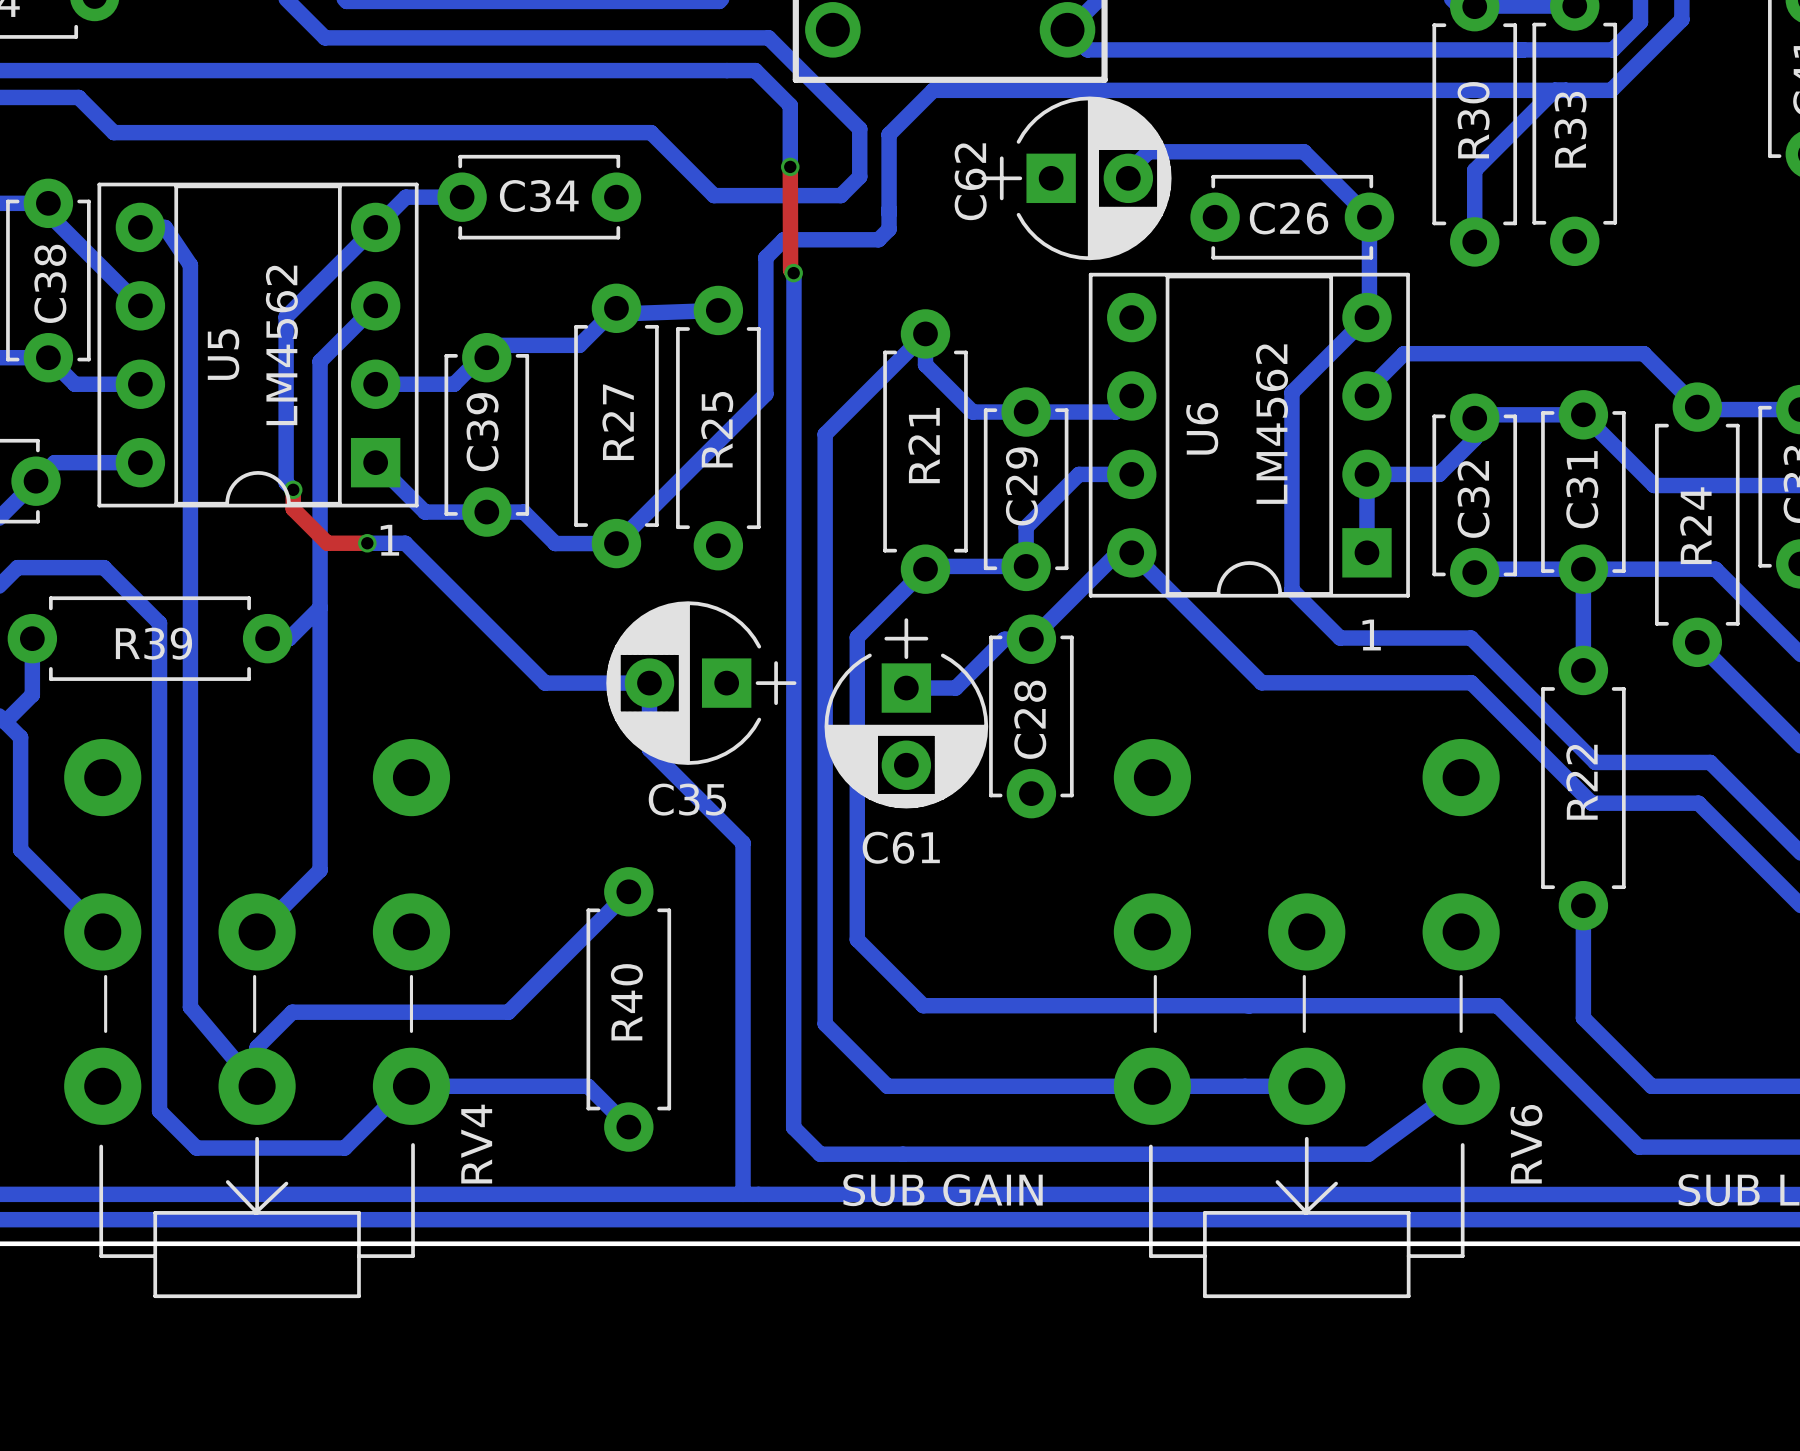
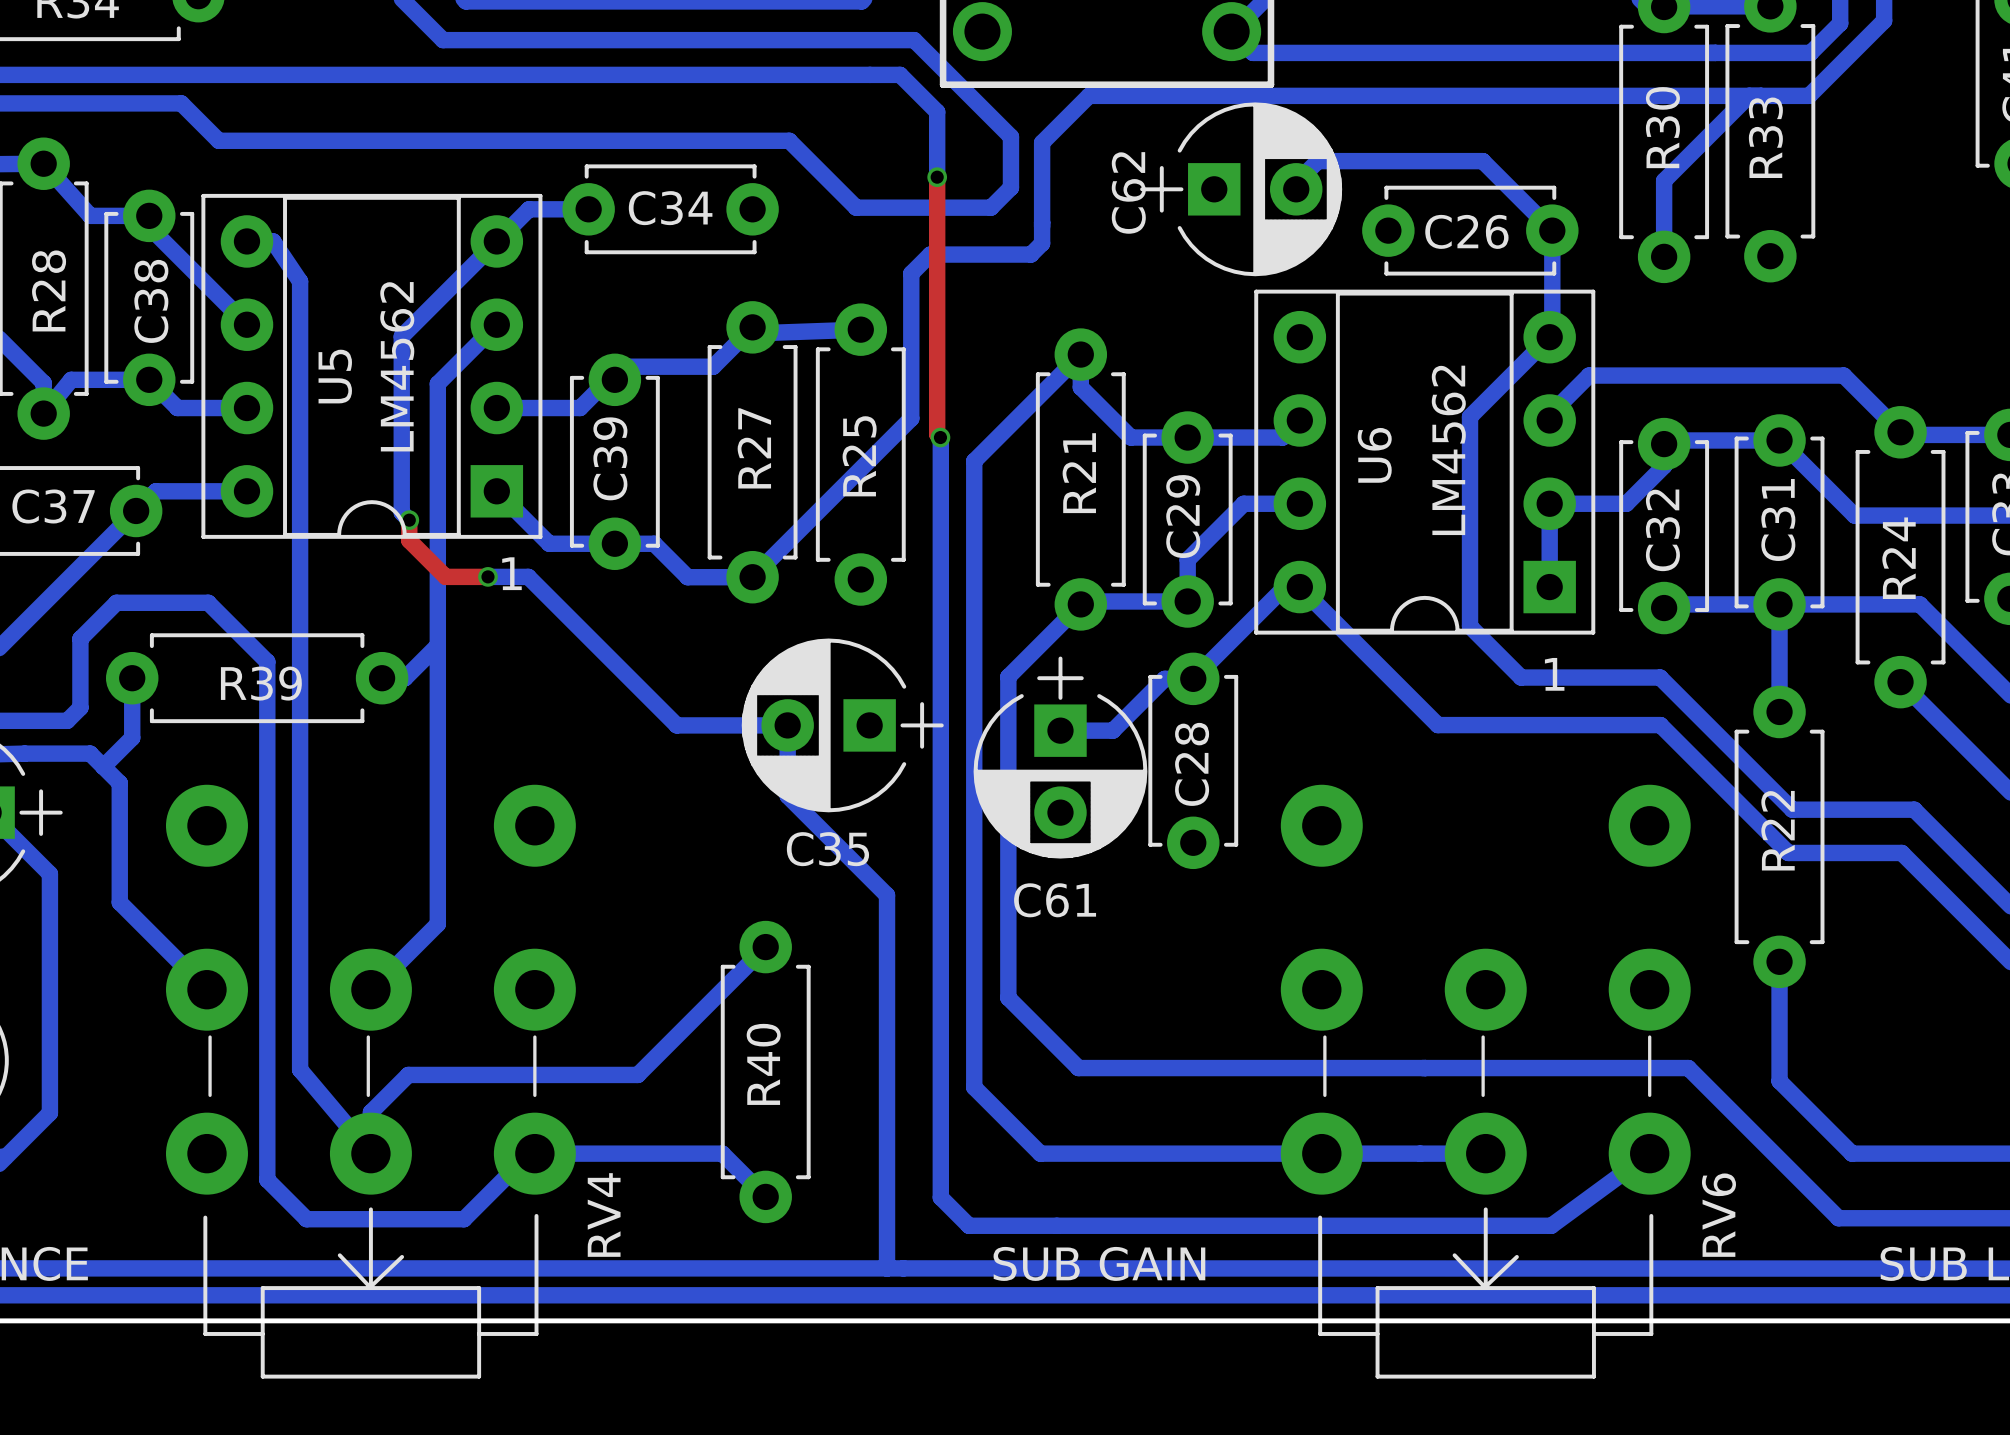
top track: (790, 166) (790, 270) (793, 273) -> (937, 177) (937, 434) (940, 437)
bottom track: (793, 273) (793, 1127) -> (940, 437) (940, 1197)
via position: (793, 273) -> (940, 437)

